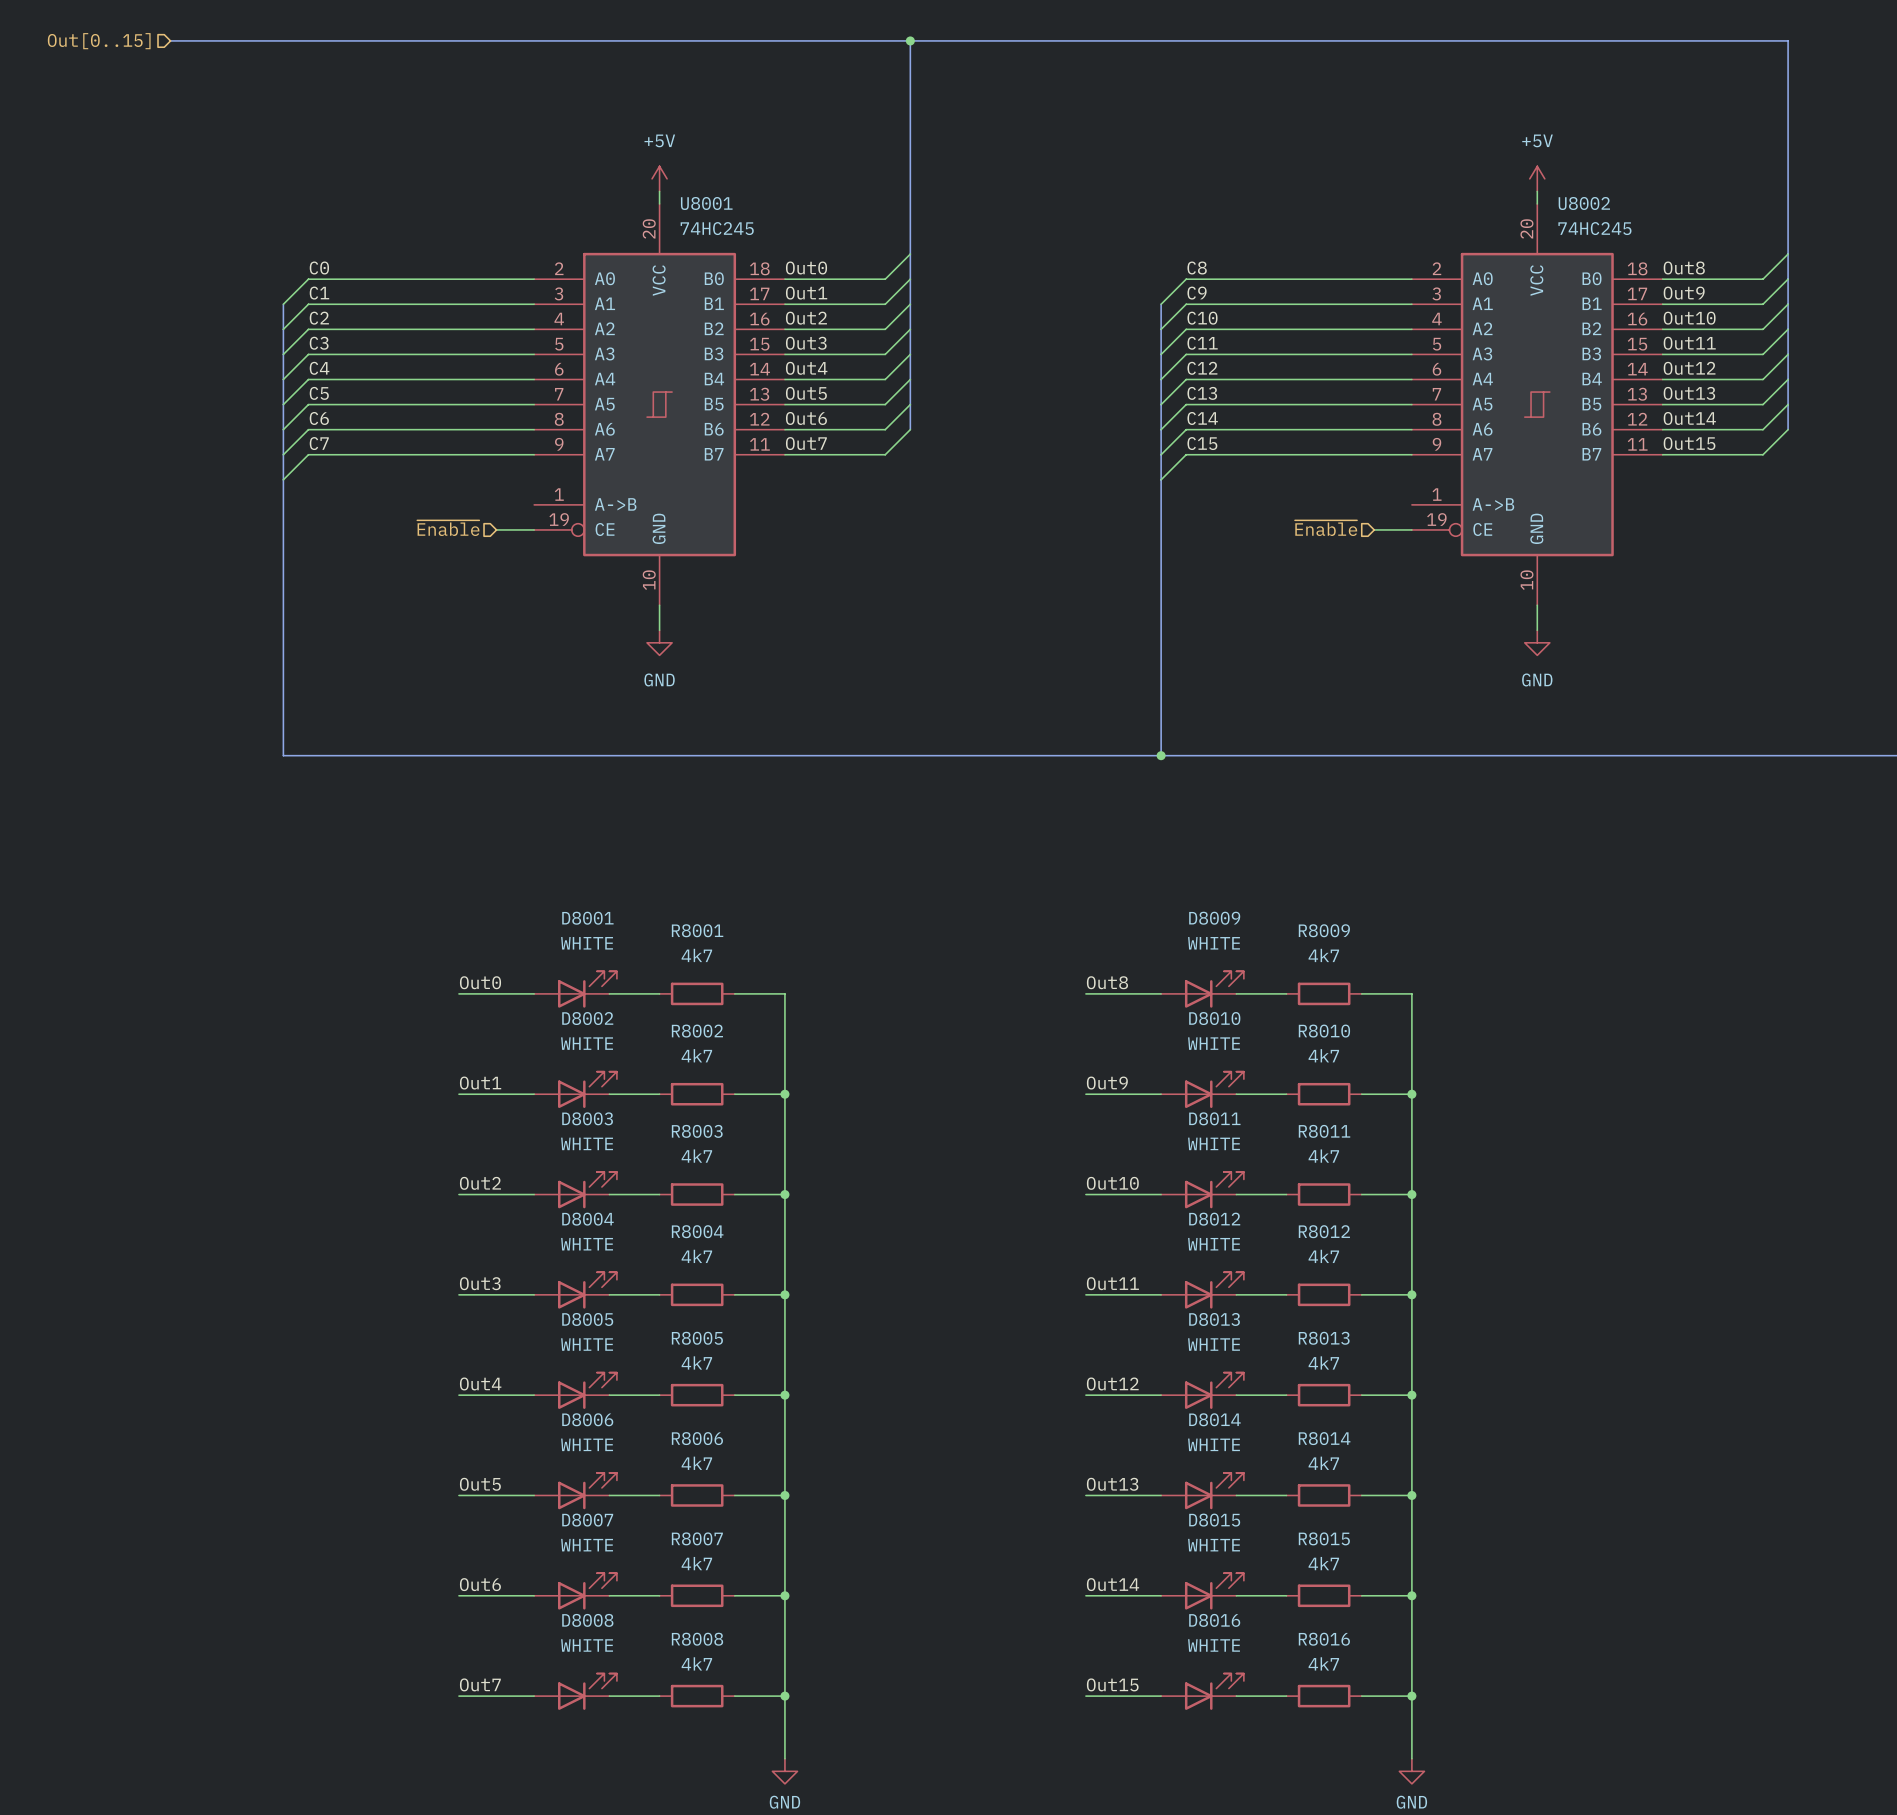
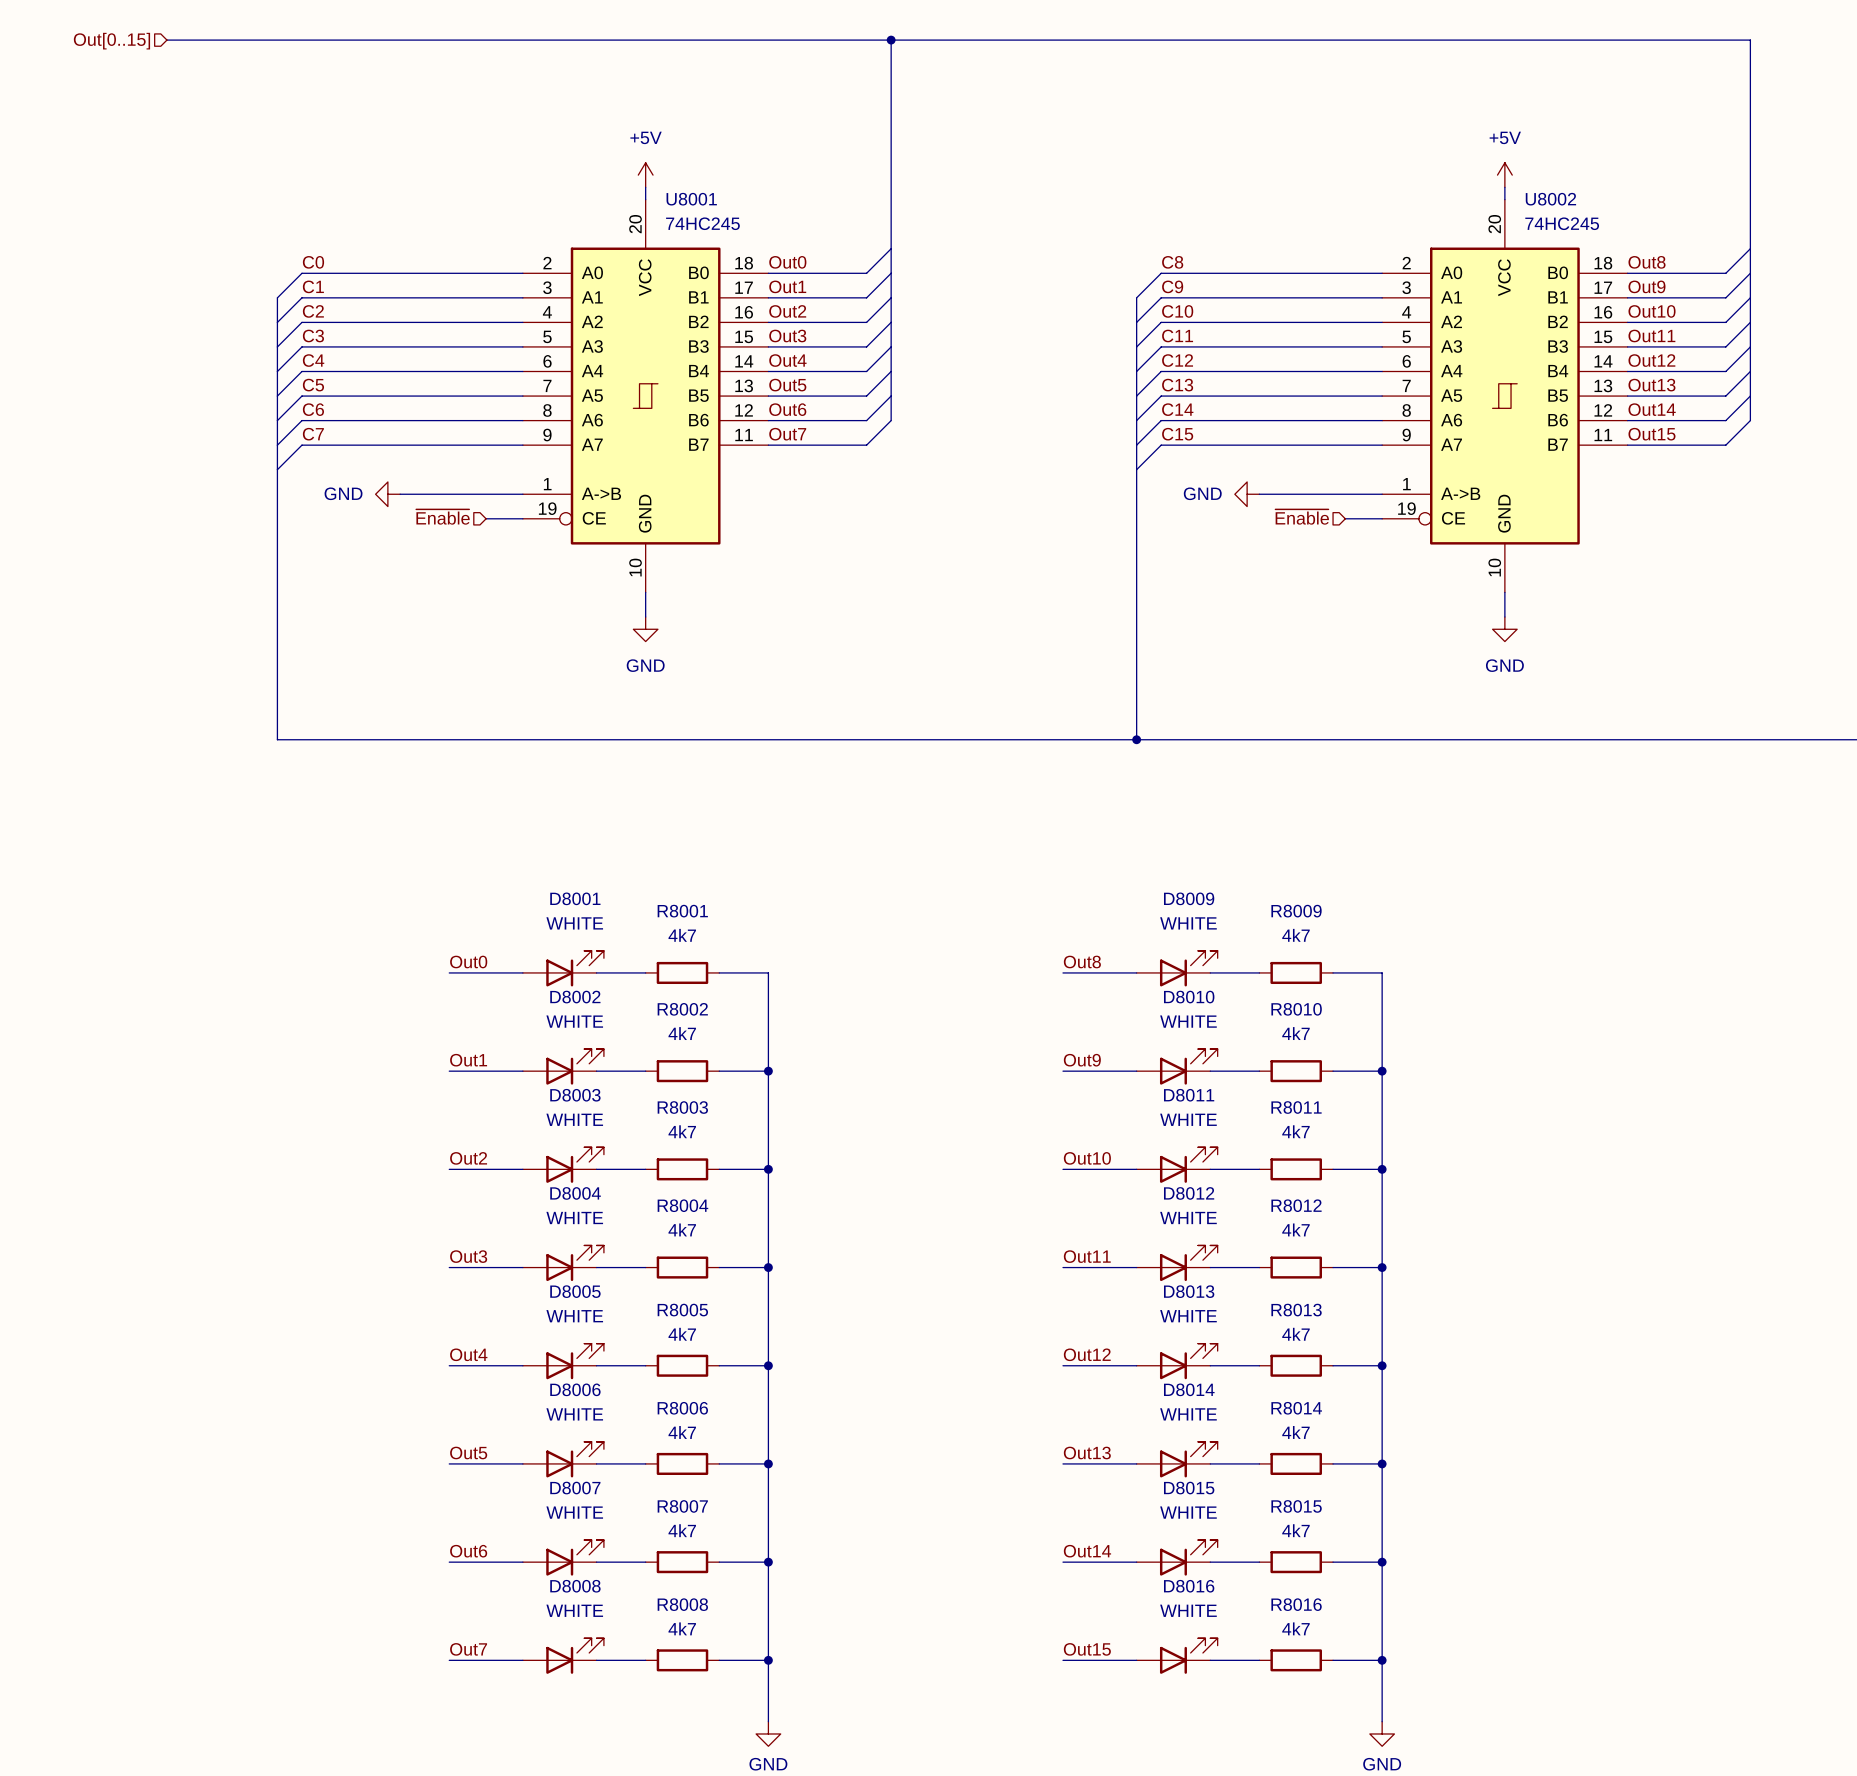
power symbol: none -> GND (387, 494)
wire: none -> (400, 494) (522, 494)
power symbol: none -> GND (1247, 494)
wire: none -> (1259, 494) (1382, 494)

